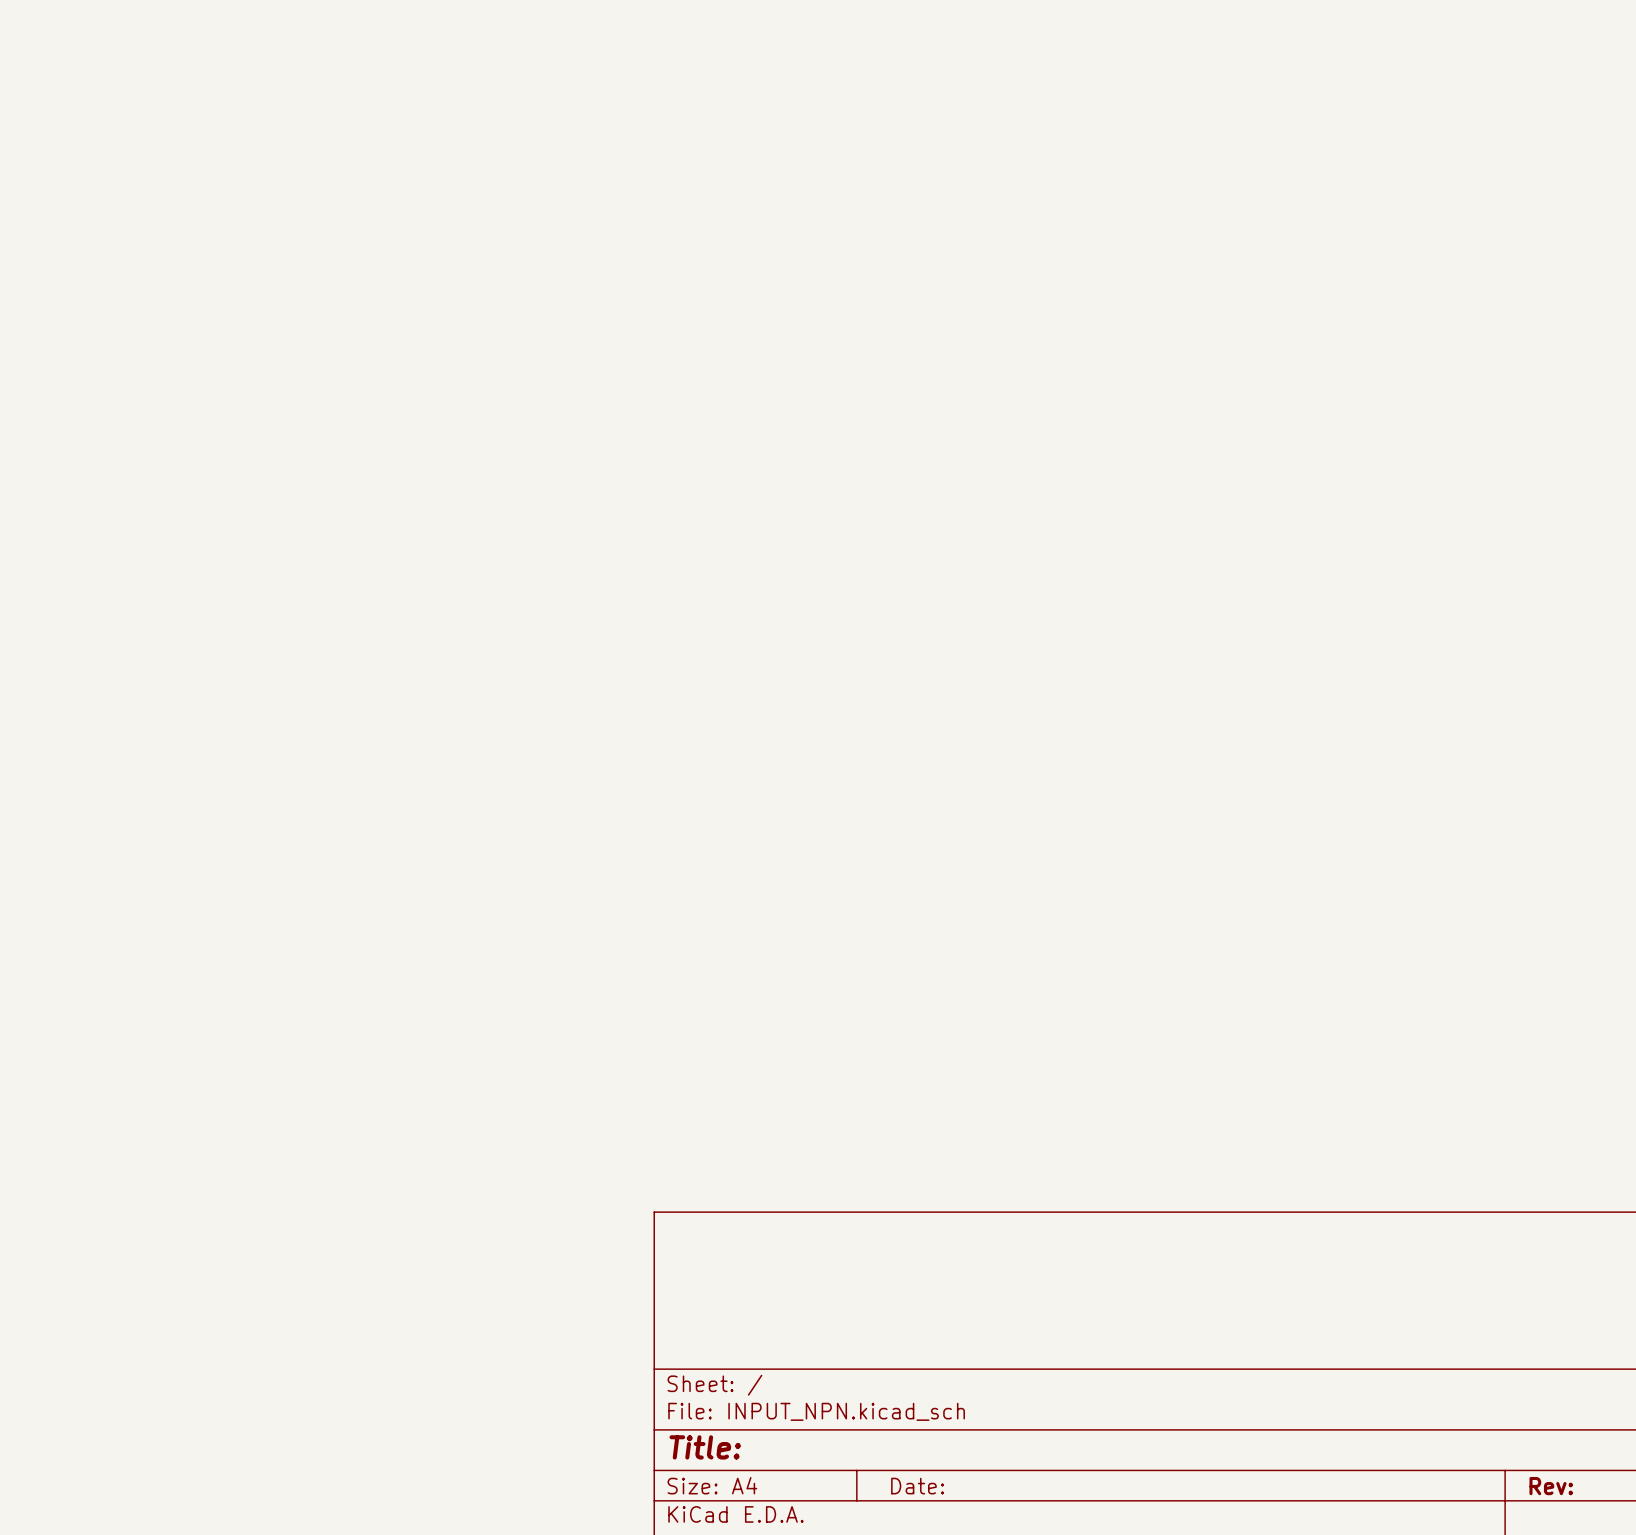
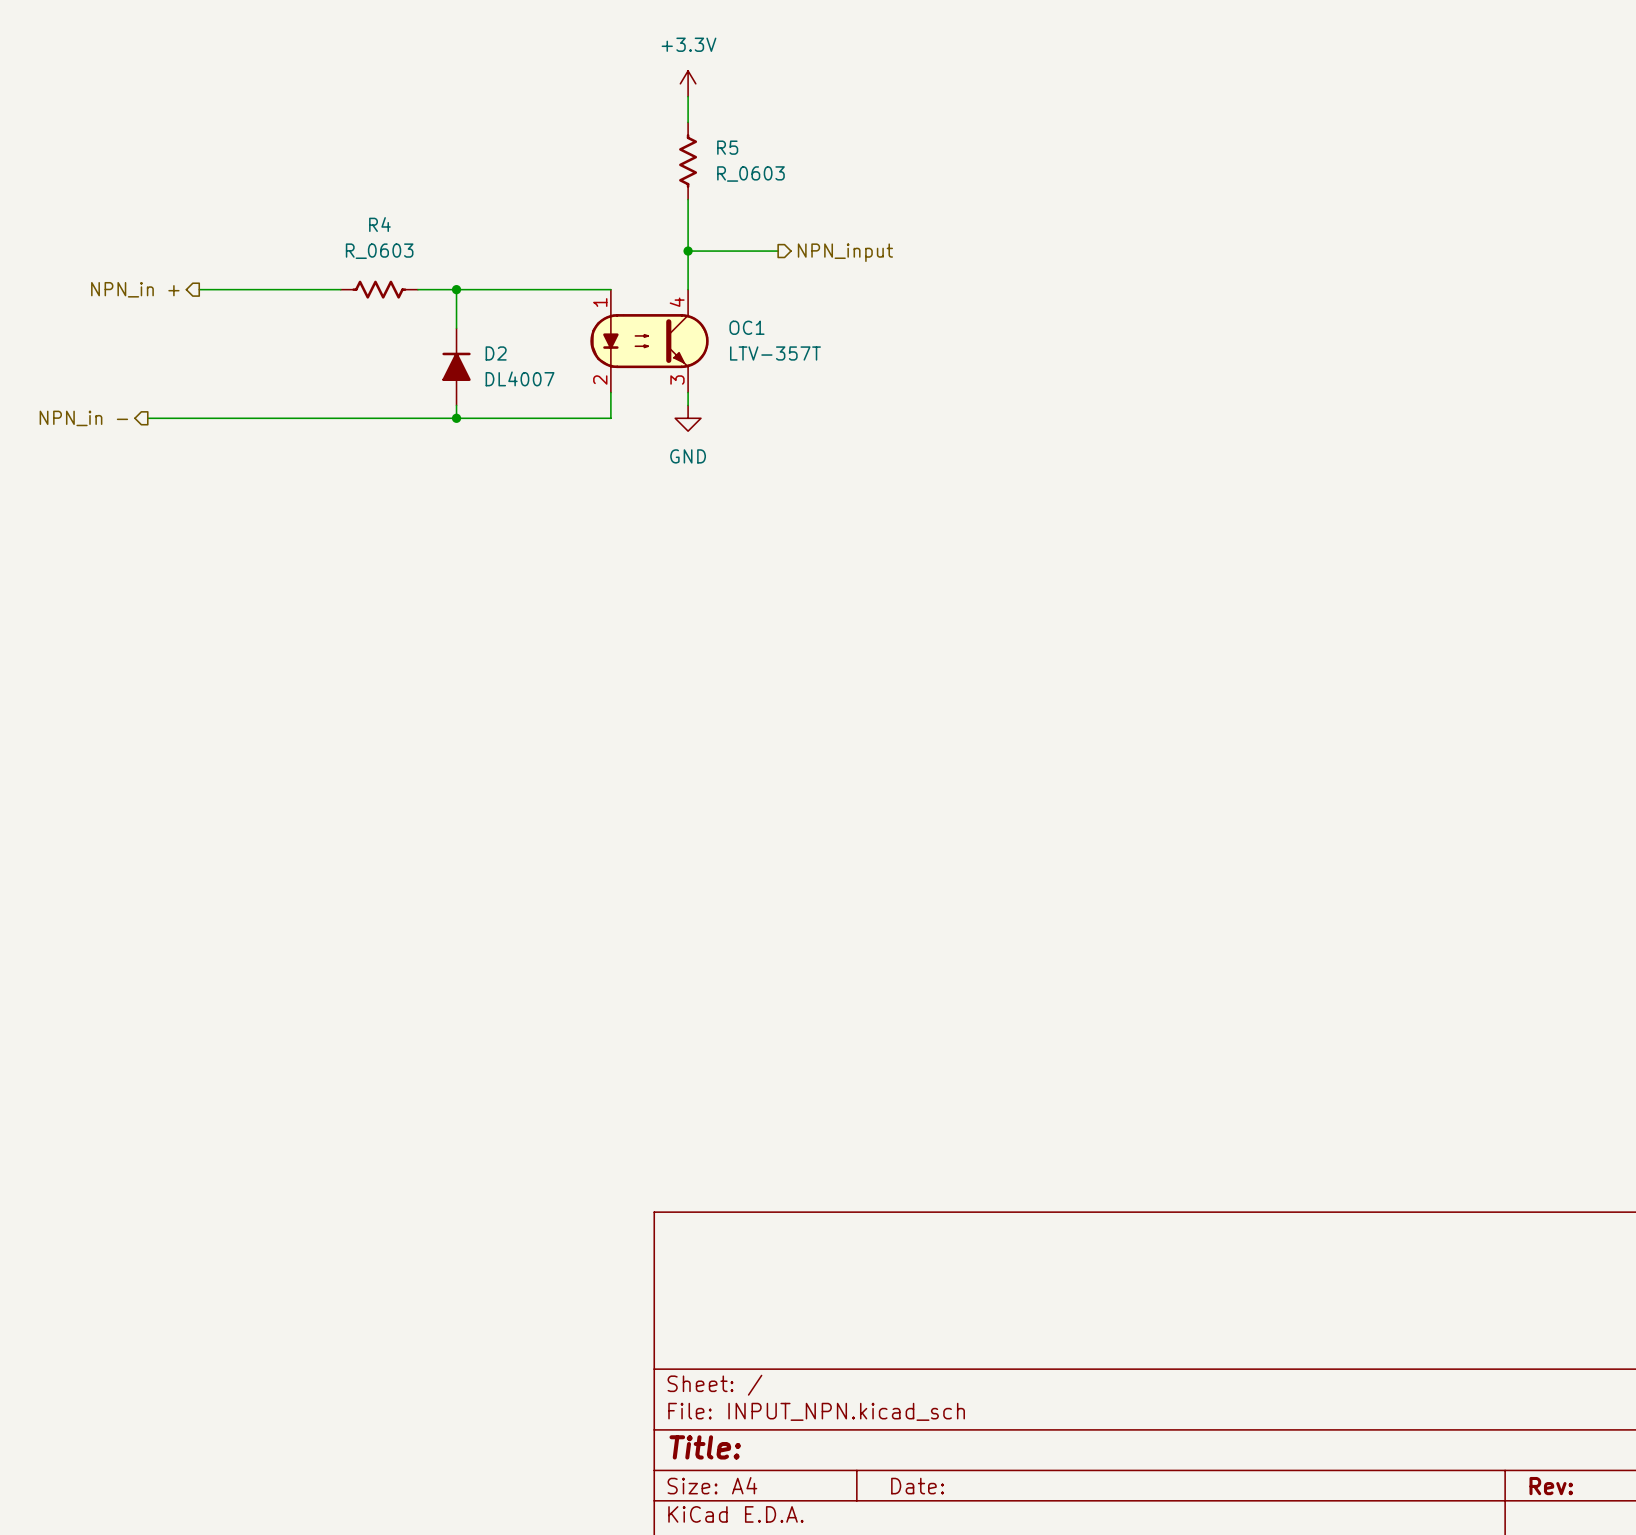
power symbol: none -> +3.3V (688, 83)
wire: none -> (688, 96) (688, 122)
R5: none -> R_0603 (688, 161)
wire: none -> (688, 199) (688, 289)
wire: none -> (688, 251) (778, 251)
junction: none -> (688, 251)
hierarchical label: none -> NPN_input (845, 252)
hierarchical label: none -> NPN_in + (135, 289)
wire: none -> (199, 289) (340, 289)
R4: none -> R_0603 (379, 289)
wire: none -> (417, 289) (610, 289)
wire: none -> (456, 289) (456, 328)
junction: none -> (456, 289)
OC1: none -> LTV-357T (649, 341)
D2: none -> DL4007 (456, 366)
wire: none -> (610, 392) (610, 418) (147, 418)
wire: none -> (688, 392) (688, 405)
wire: none -> (456, 405) (456, 418)
hierarchical label: none -> NPN_in - (83, 418)
junction: none -> (456, 418)
power symbol: none -> GND (688, 418)

